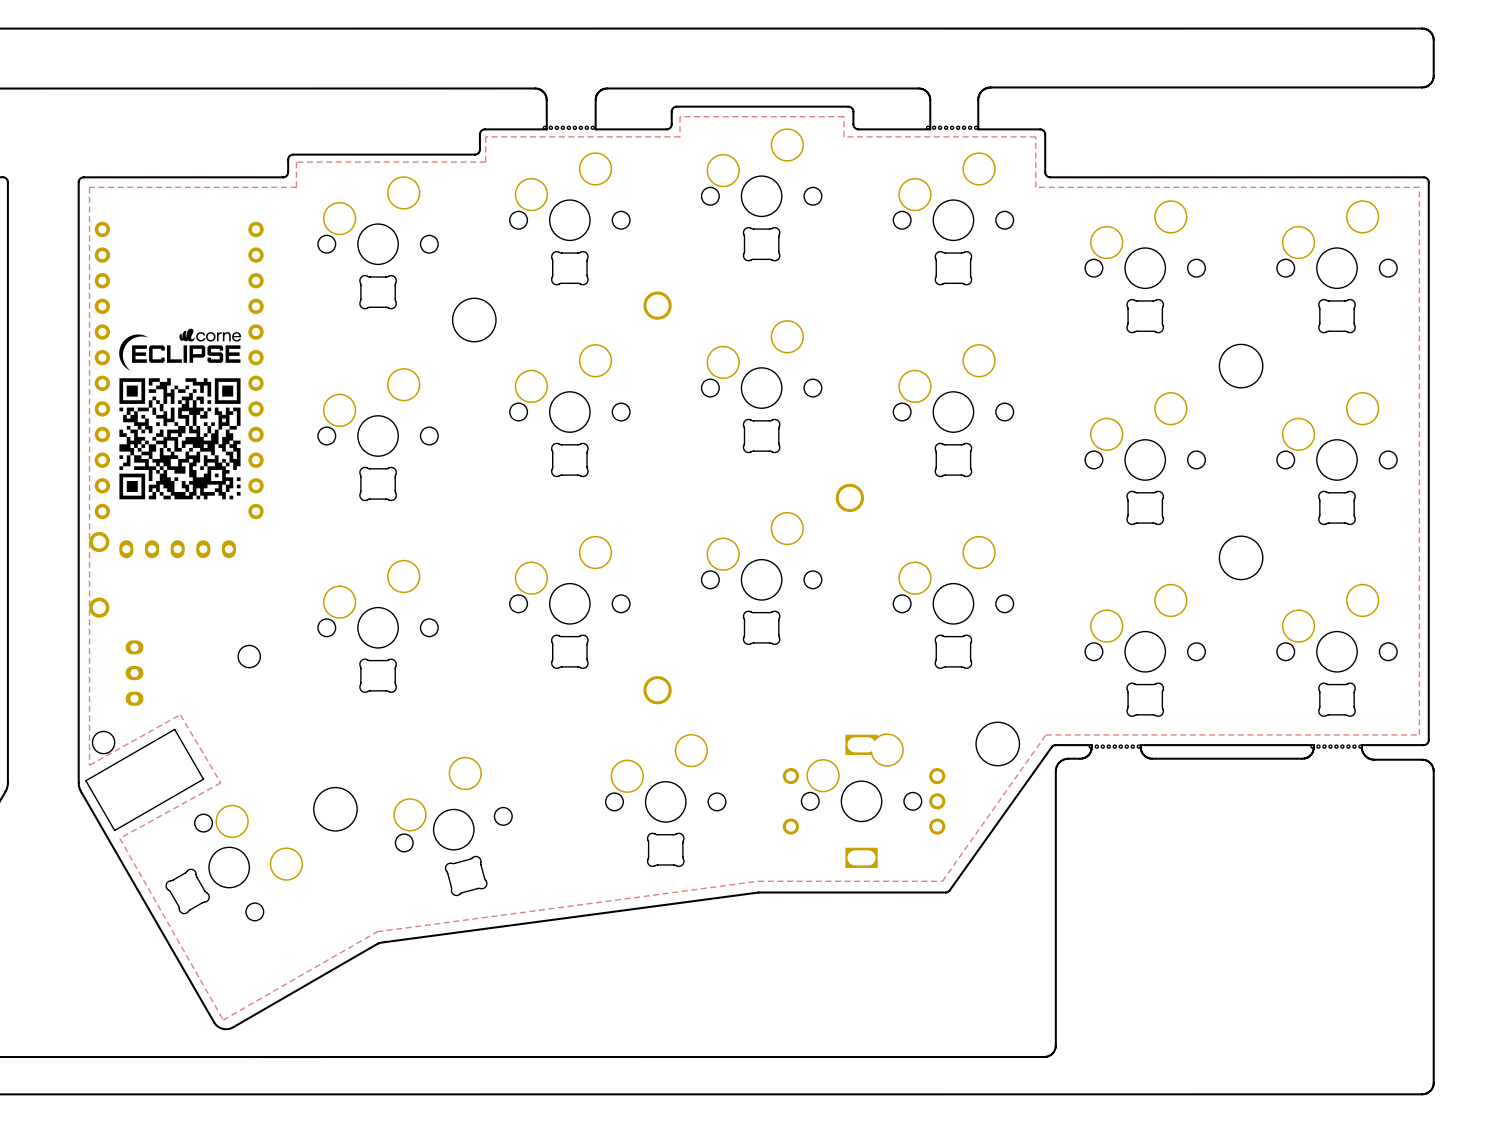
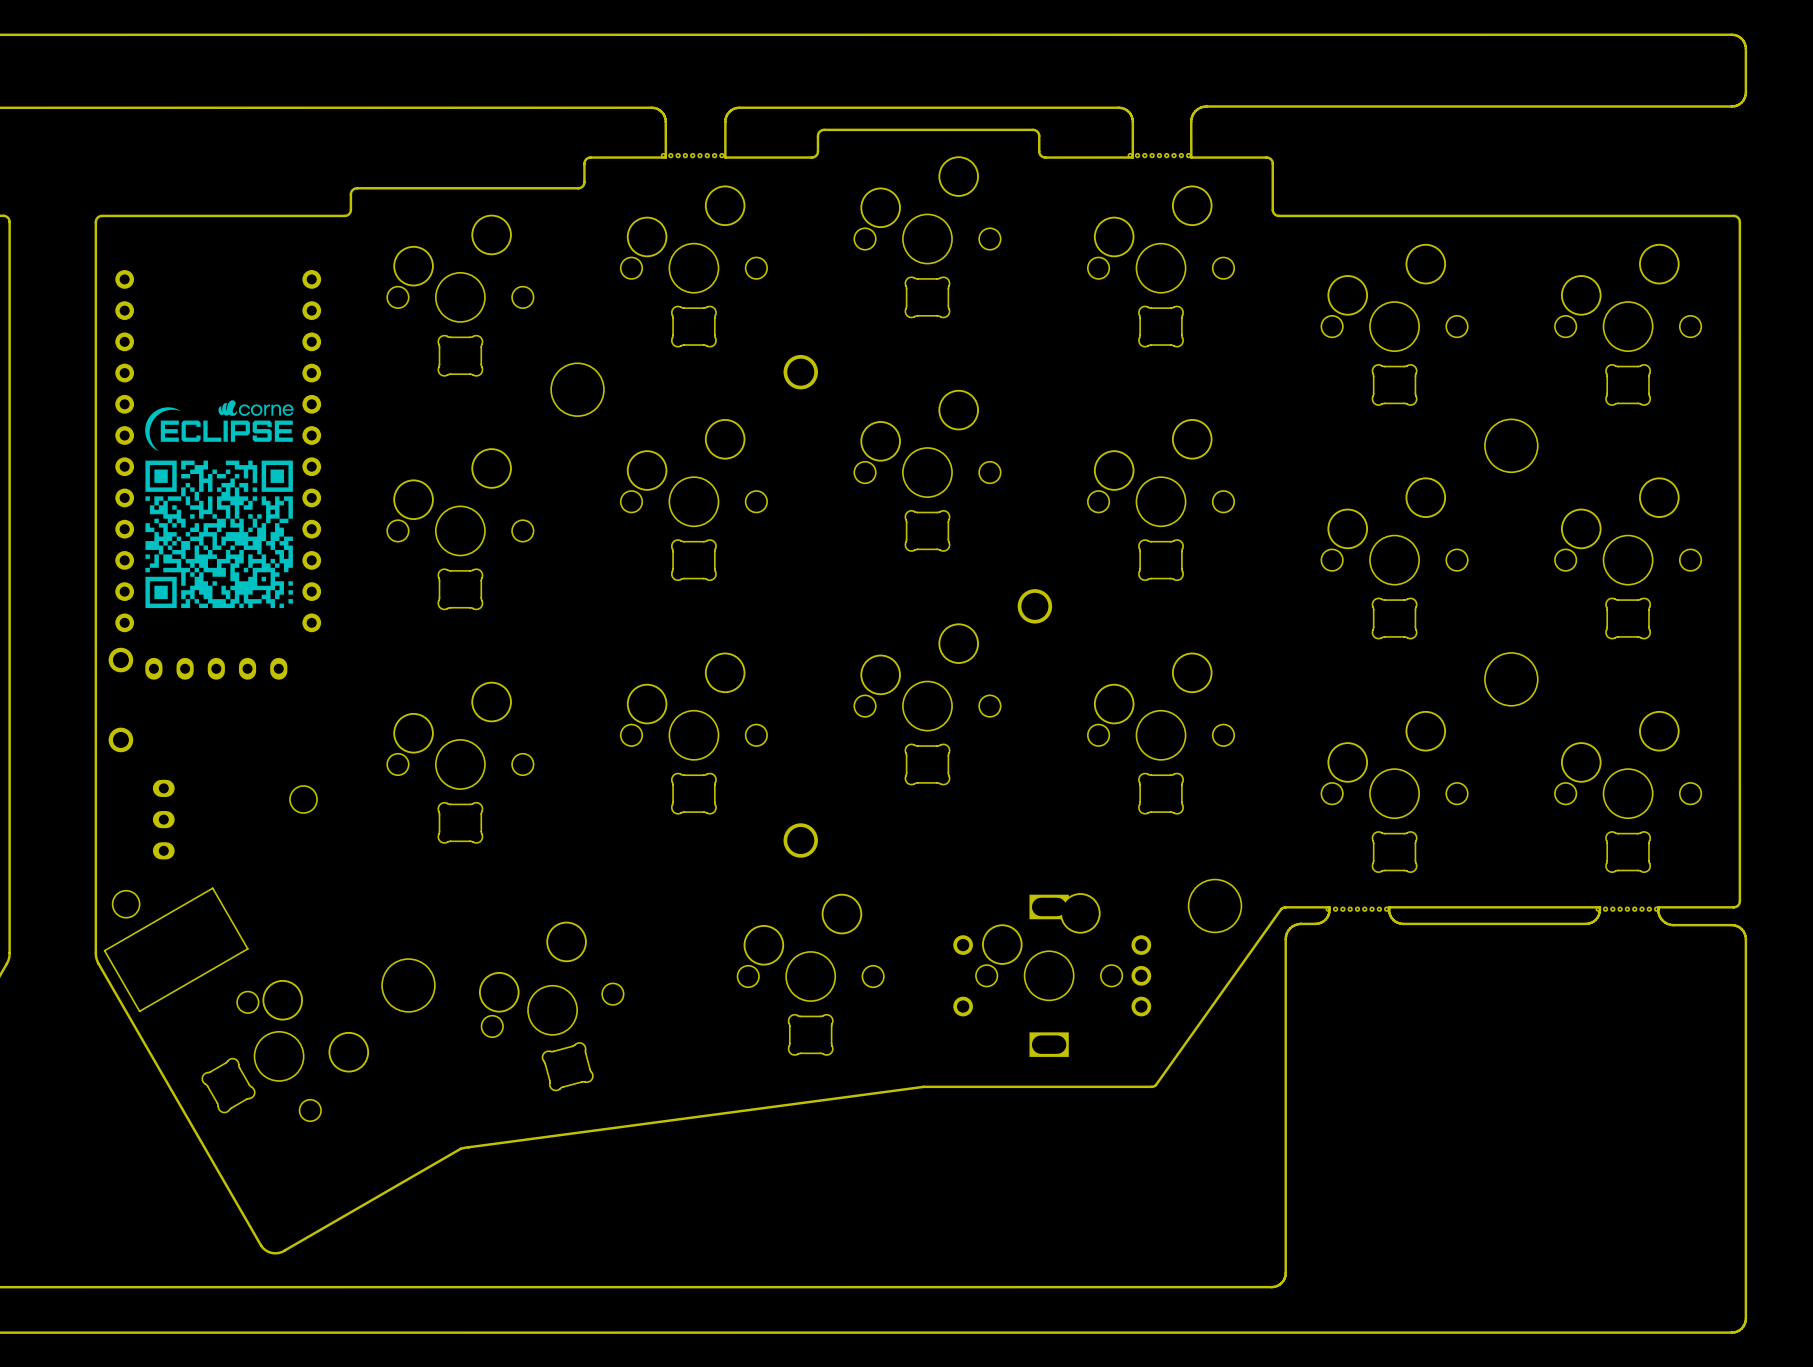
zone outline: (680, 116) (844, 116) (844, 136) (1035, 136) (1035, 187) (1419, 187) (1419, 734) (1045, 734) (942, 881) (758, 881) (377, 931) (223, 1020) (119, 838) (220, 782) (180, 714) (89, 765) (89, 187) (296, 187) (296, 162) (485, 162) (485, 136) (680, 136) (680, 116) -> none

